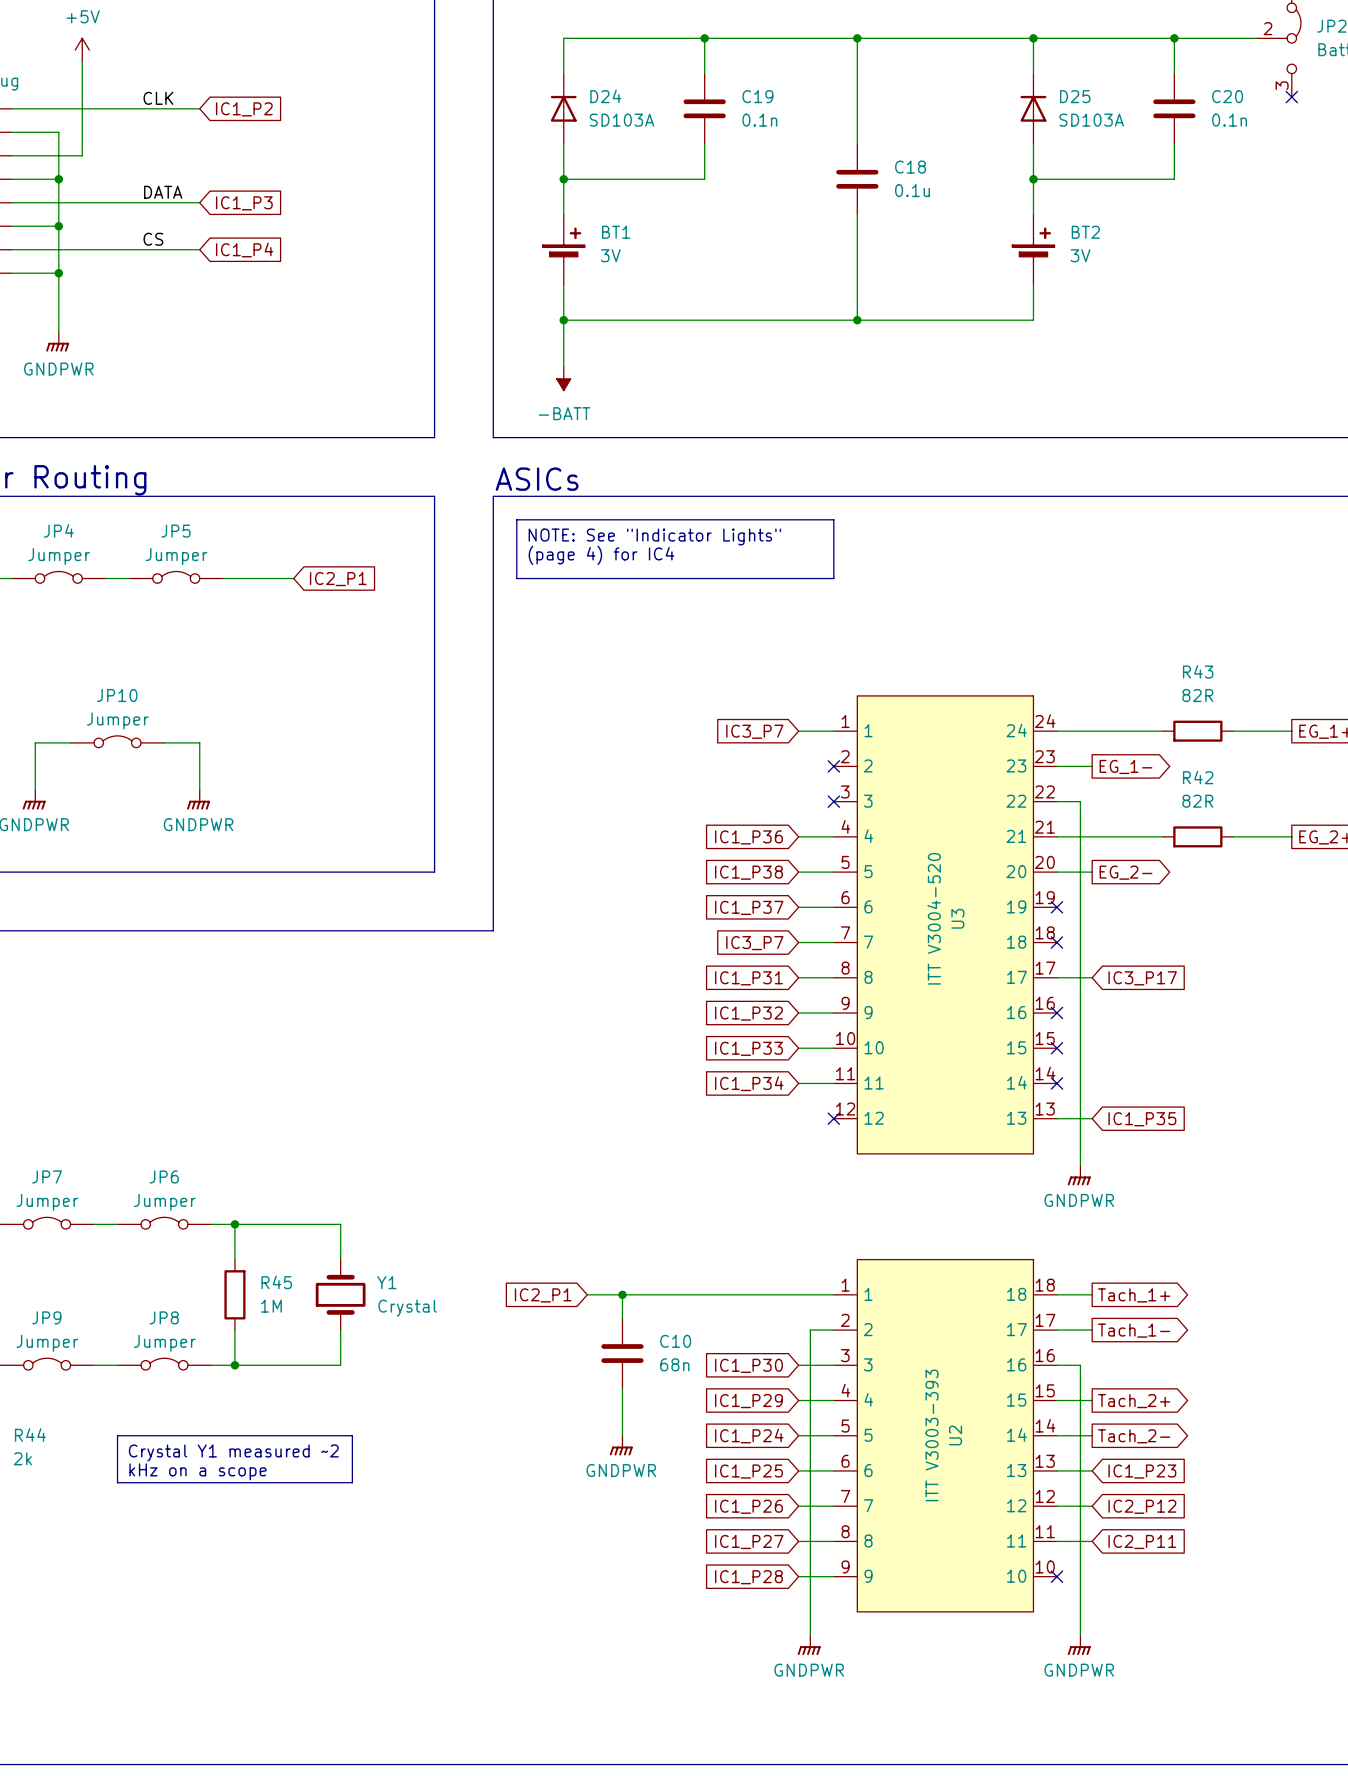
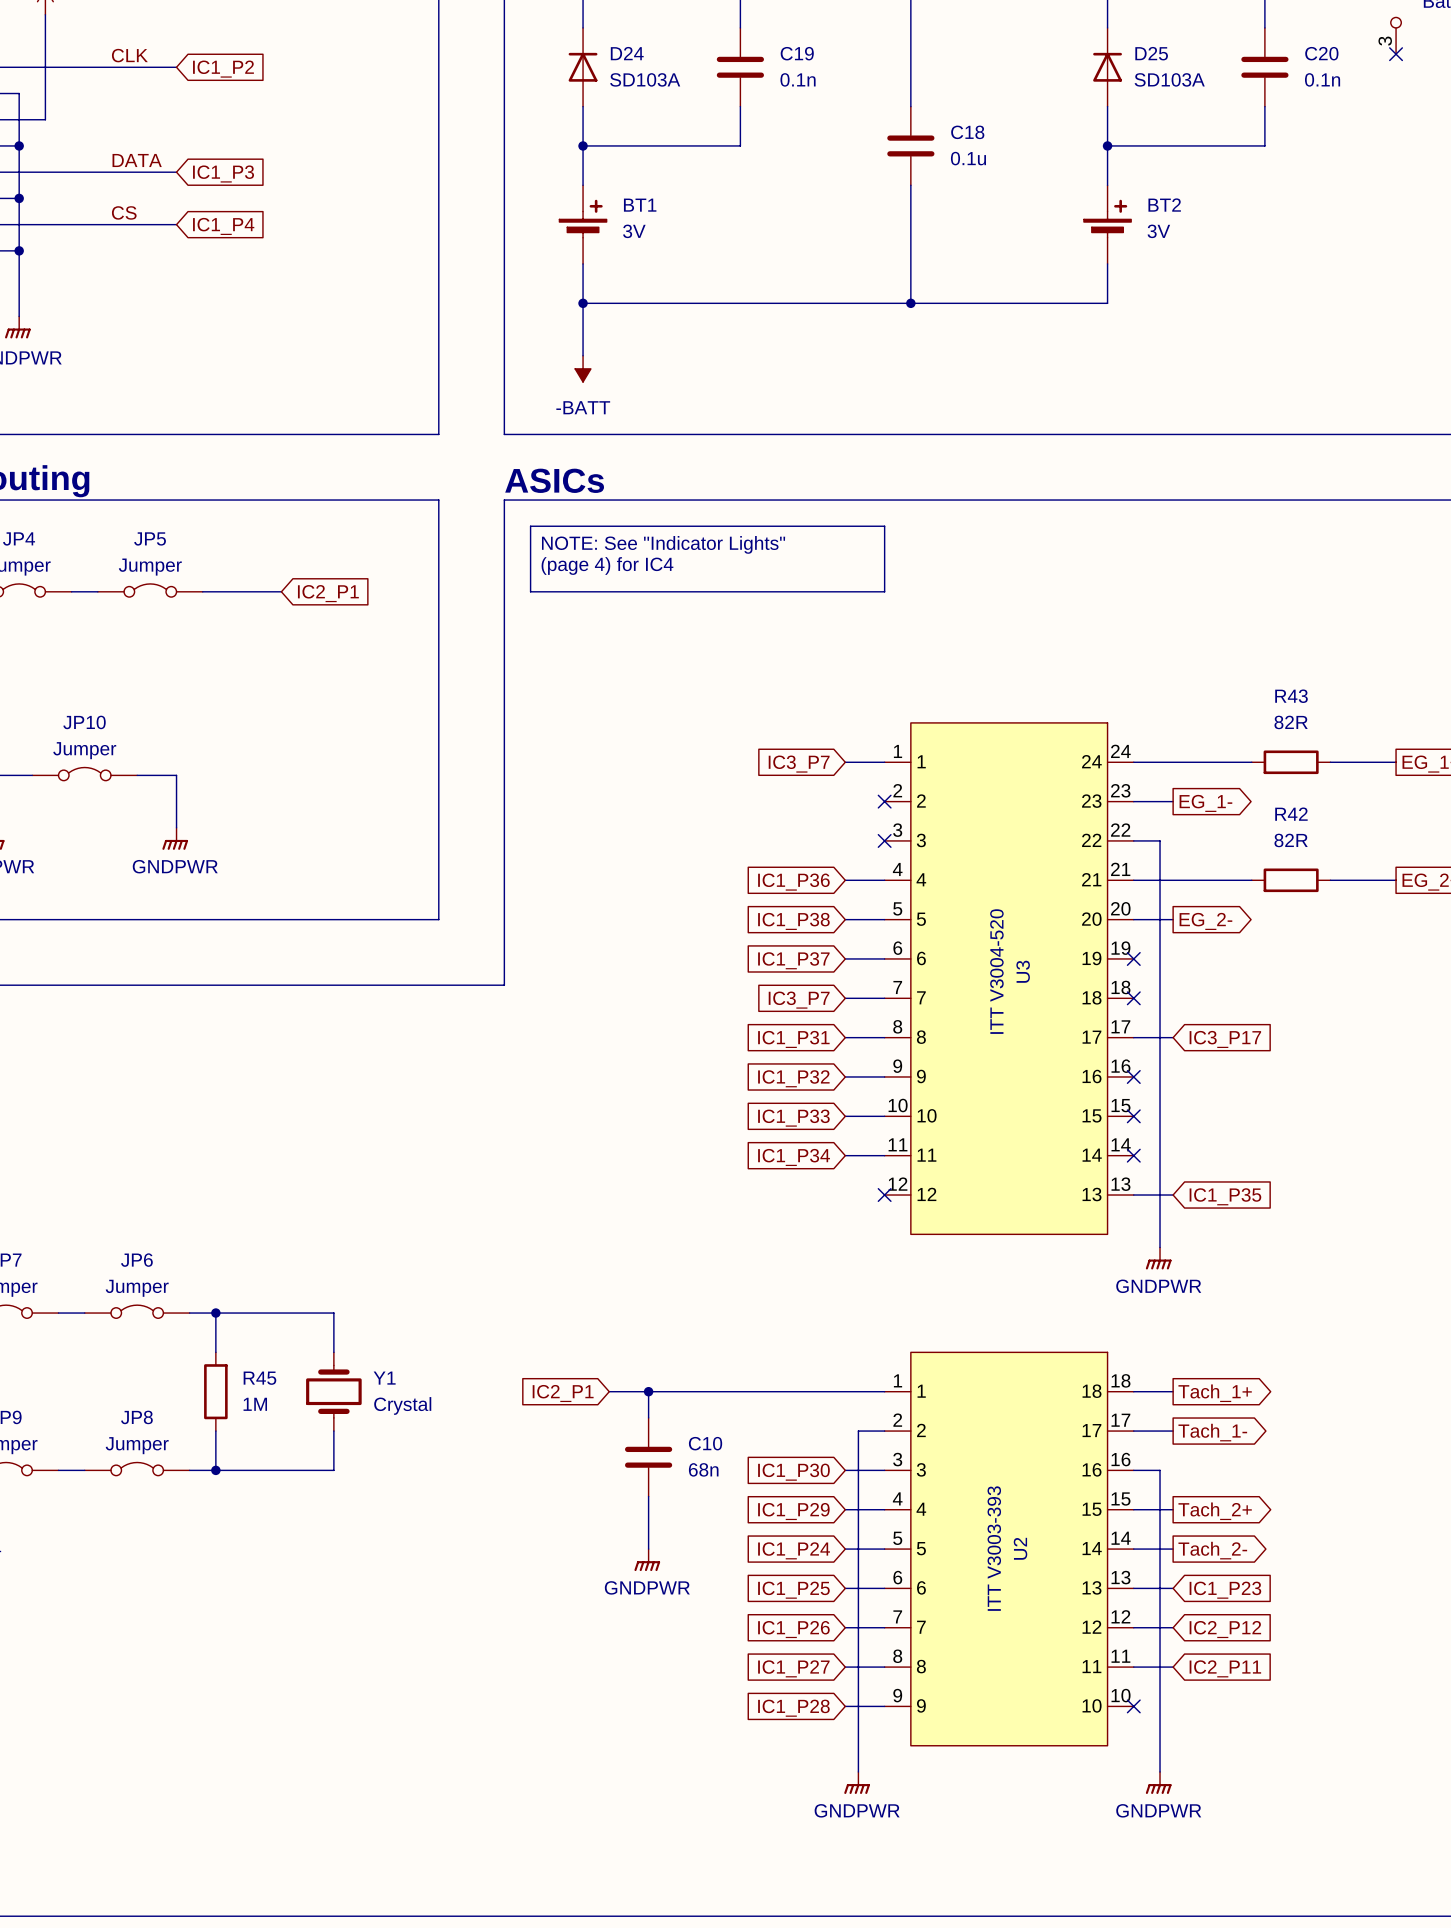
line: (117, 1435) (352, 1435) (352, 1482) (117, 1482) (117, 1435) -> none
text: Crystal Y1 measured ~2 (233, 1452) -> none
text: kHz on a scope (197, 1471) -> none

